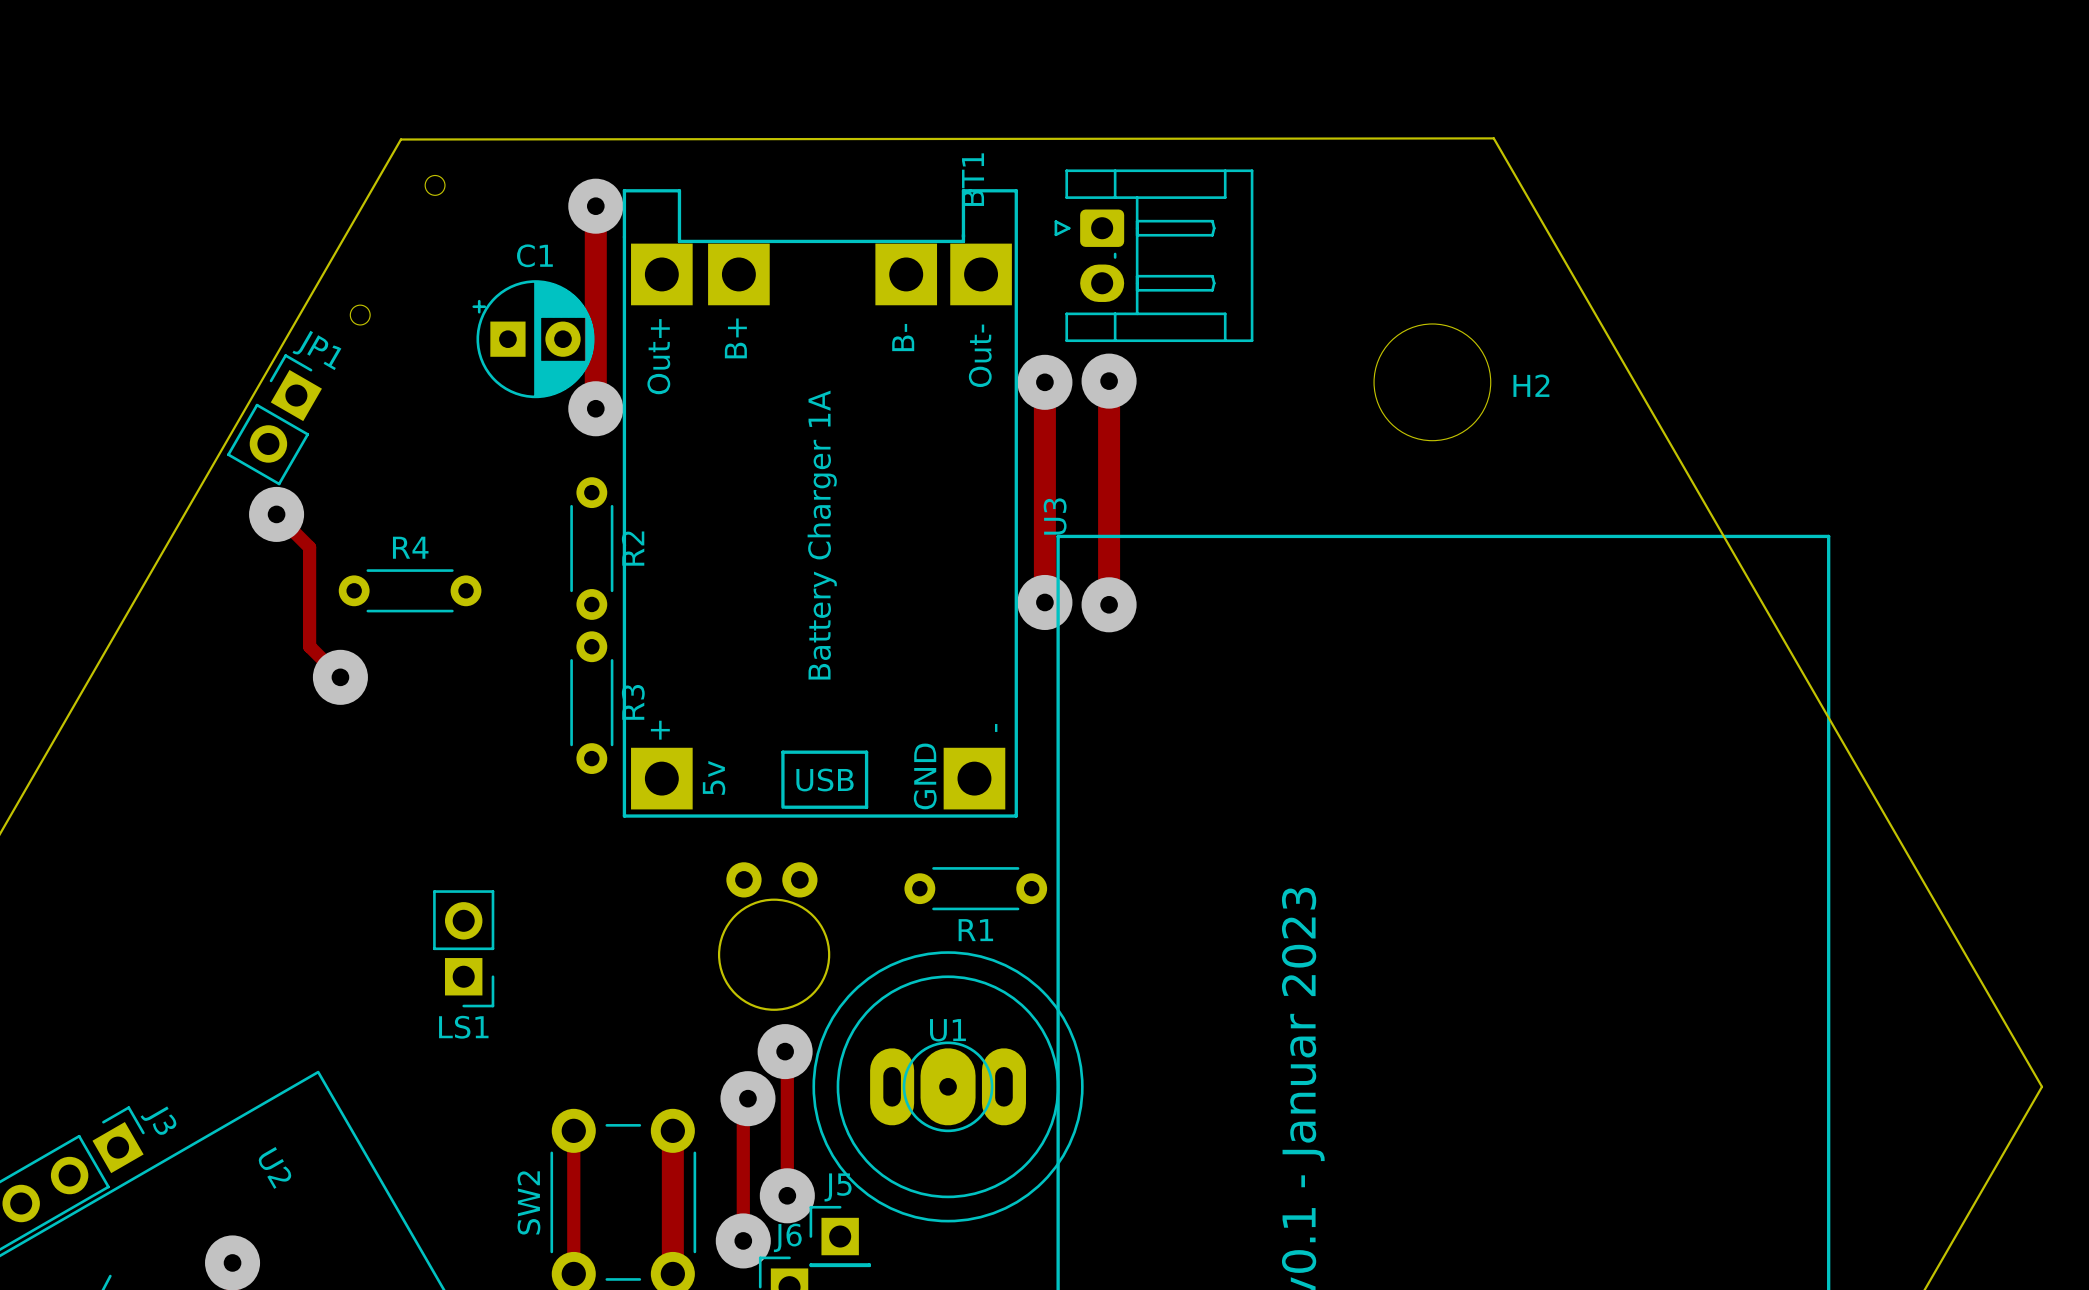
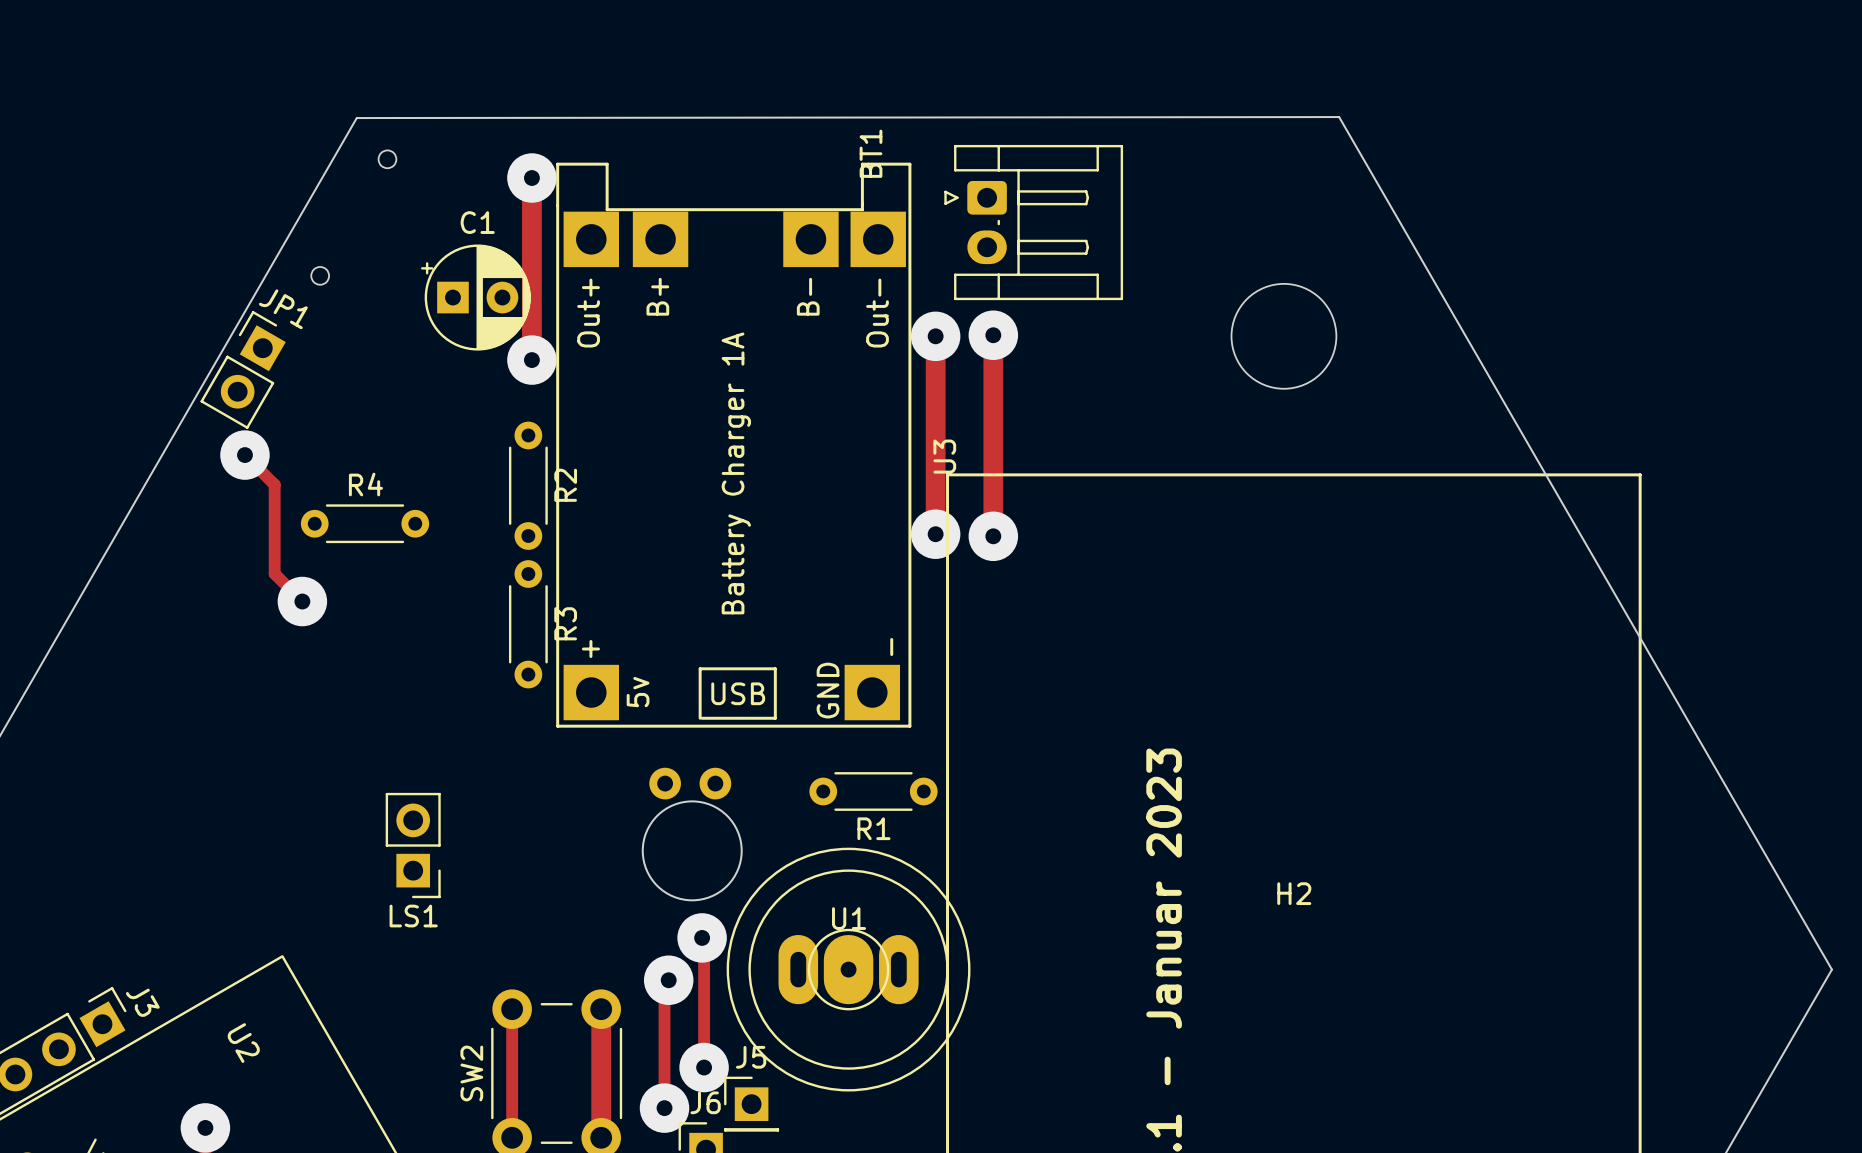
H2 name position: H2 (1531, 385) -> H2 (1294, 893)

